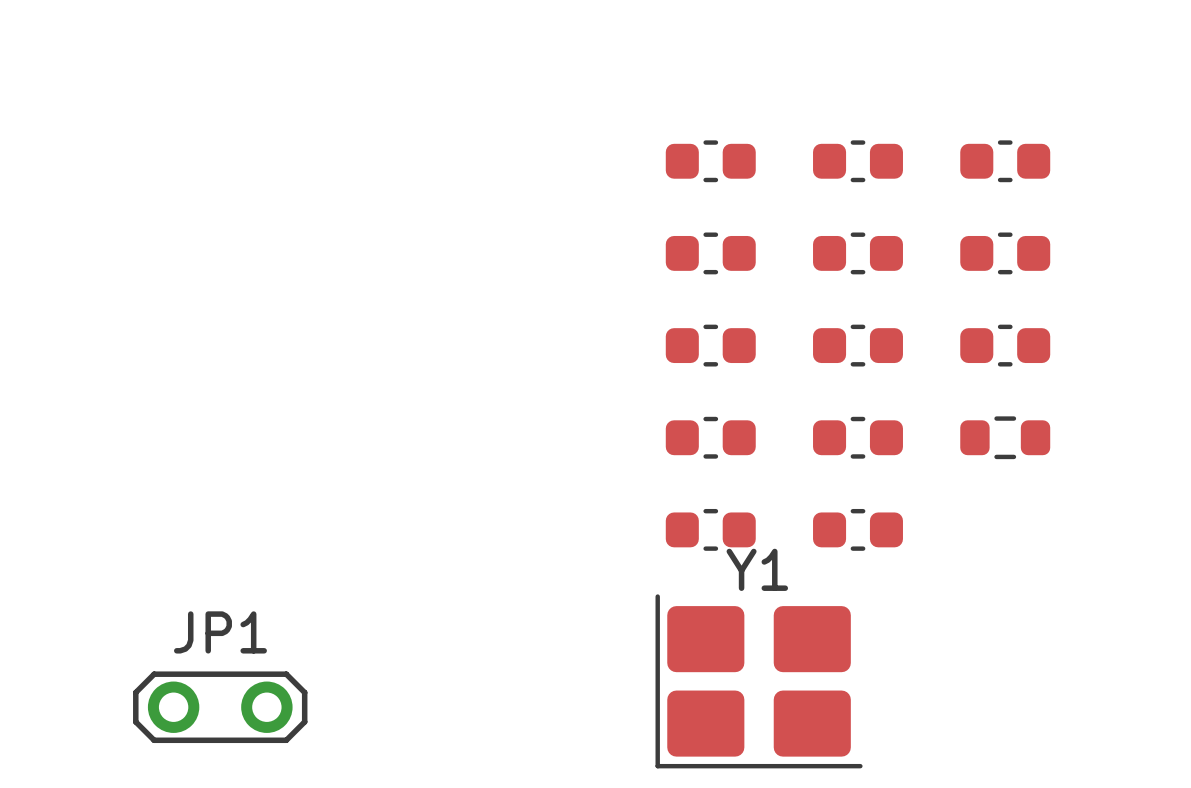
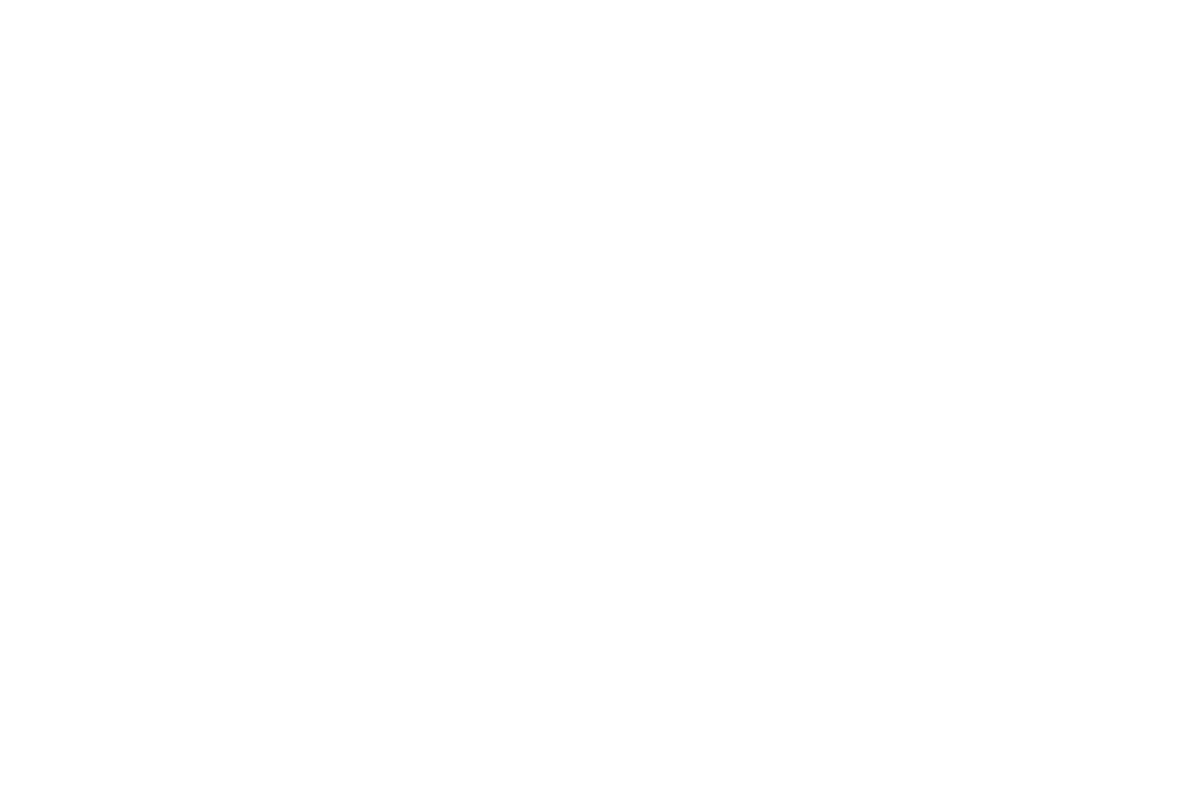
part: (710, 161) -> none
part: (858, 161) -> none
part: (1005, 161) -> none
part: (710, 253) -> none
part: (858, 253) -> none
part: (1005, 253) -> none
part: (710, 345) -> none
part: (858, 345) -> none
part: (1005, 345) -> none
part: (710, 437) -> none
part: (858, 437) -> none
part: (1005, 437) -> none
part: (710, 529) -> none
part: (858, 529) -> none
Y1: (759, 681) -> none
JP1: (220, 707) -> none

